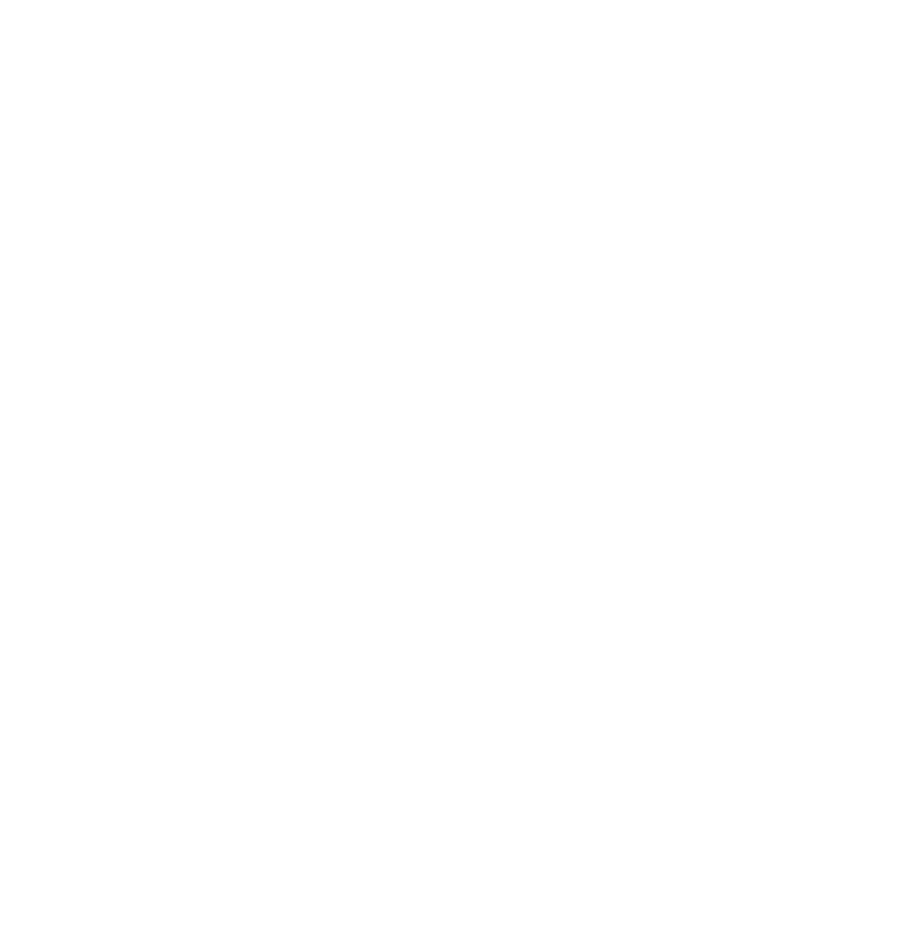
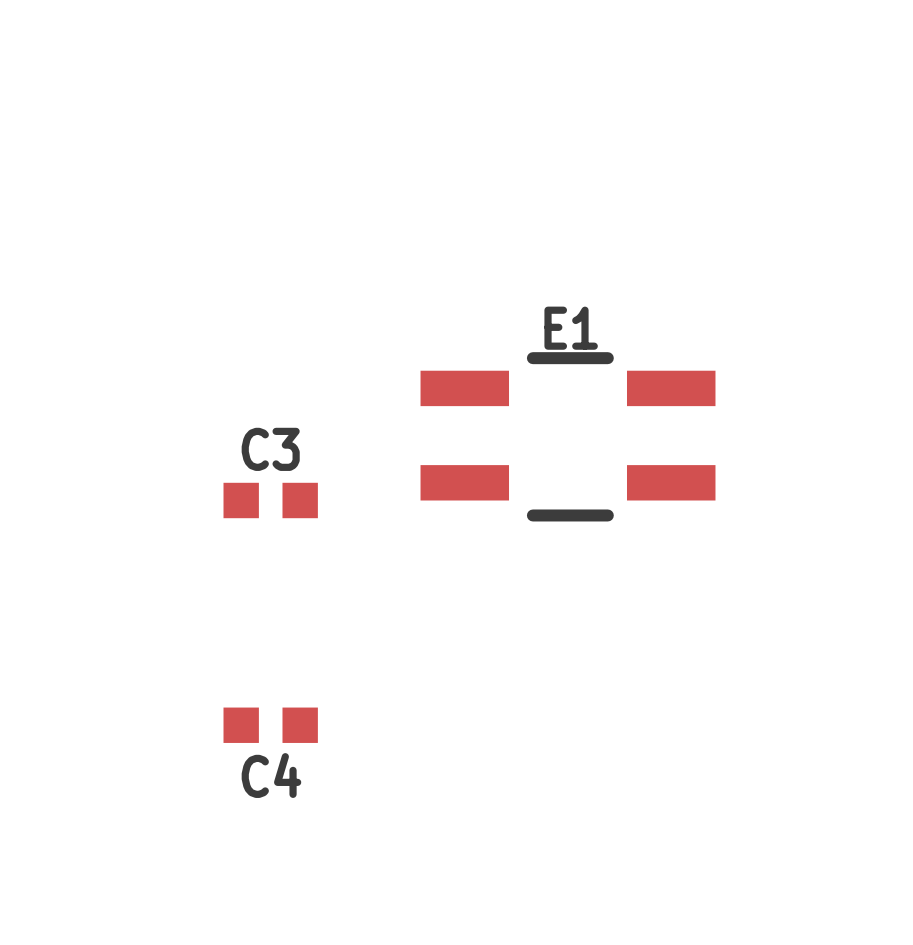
E1: none -> (568, 436)
C3: none -> (270, 500)
C4: none -> (270, 725)

